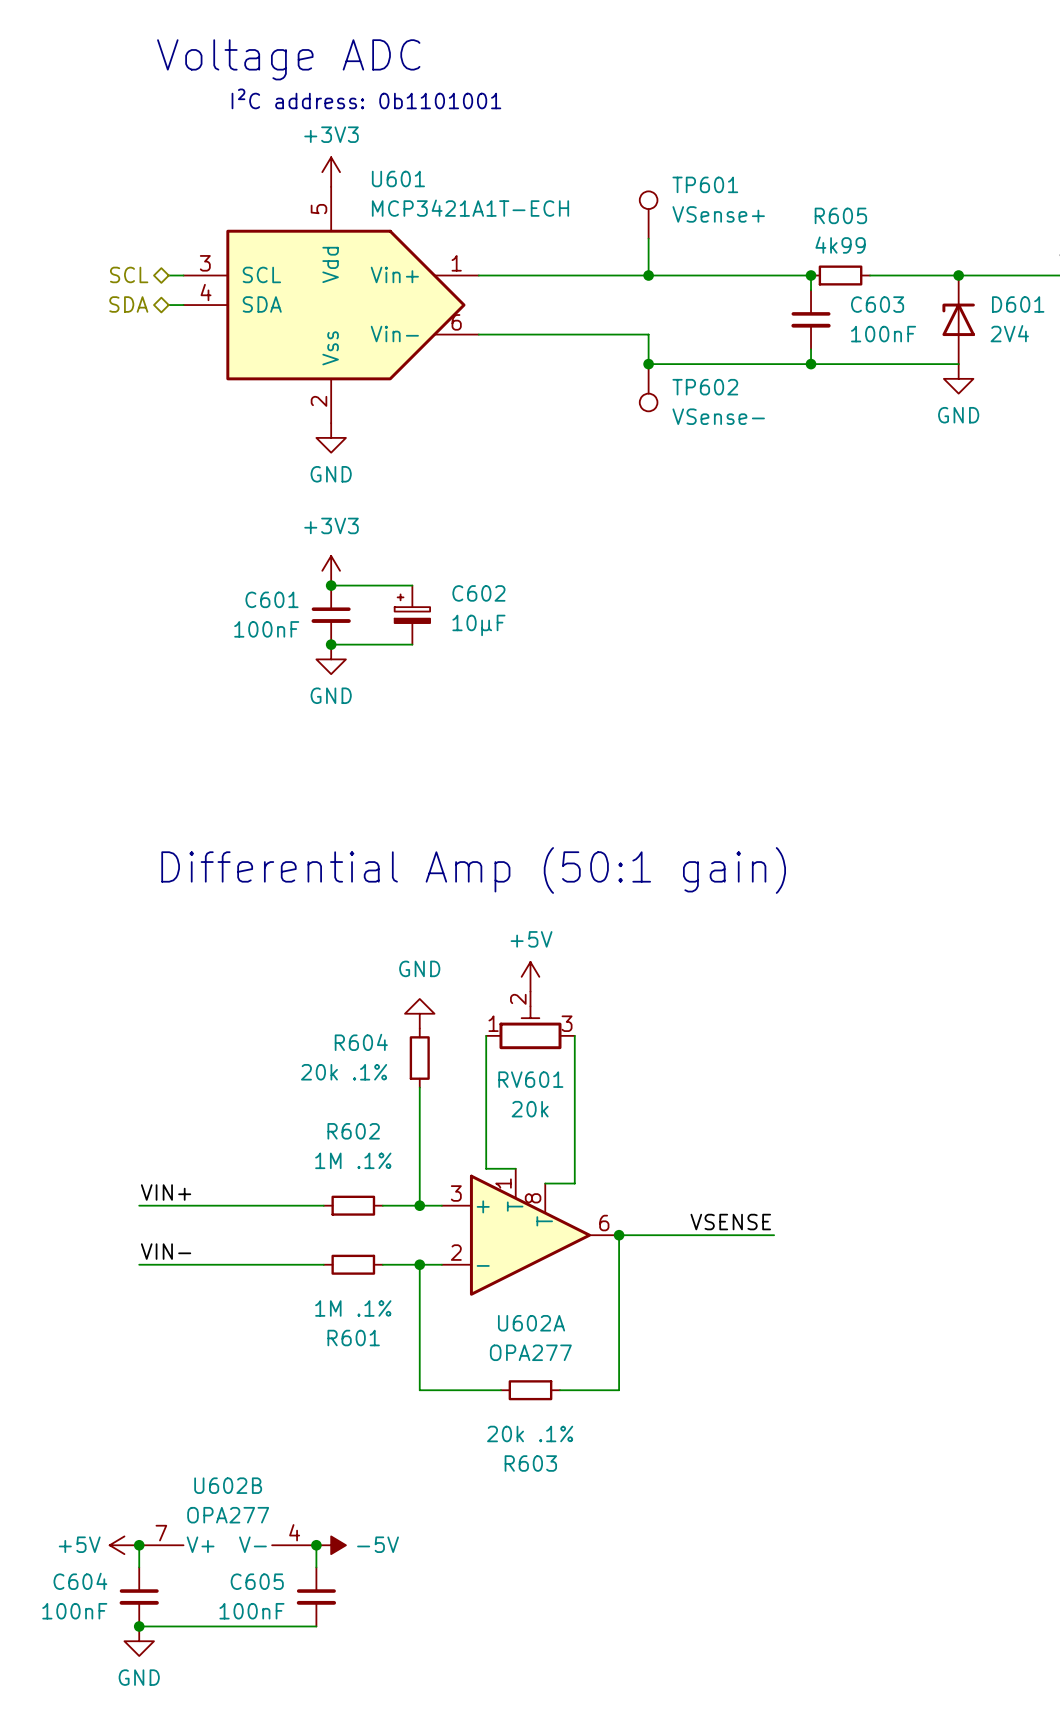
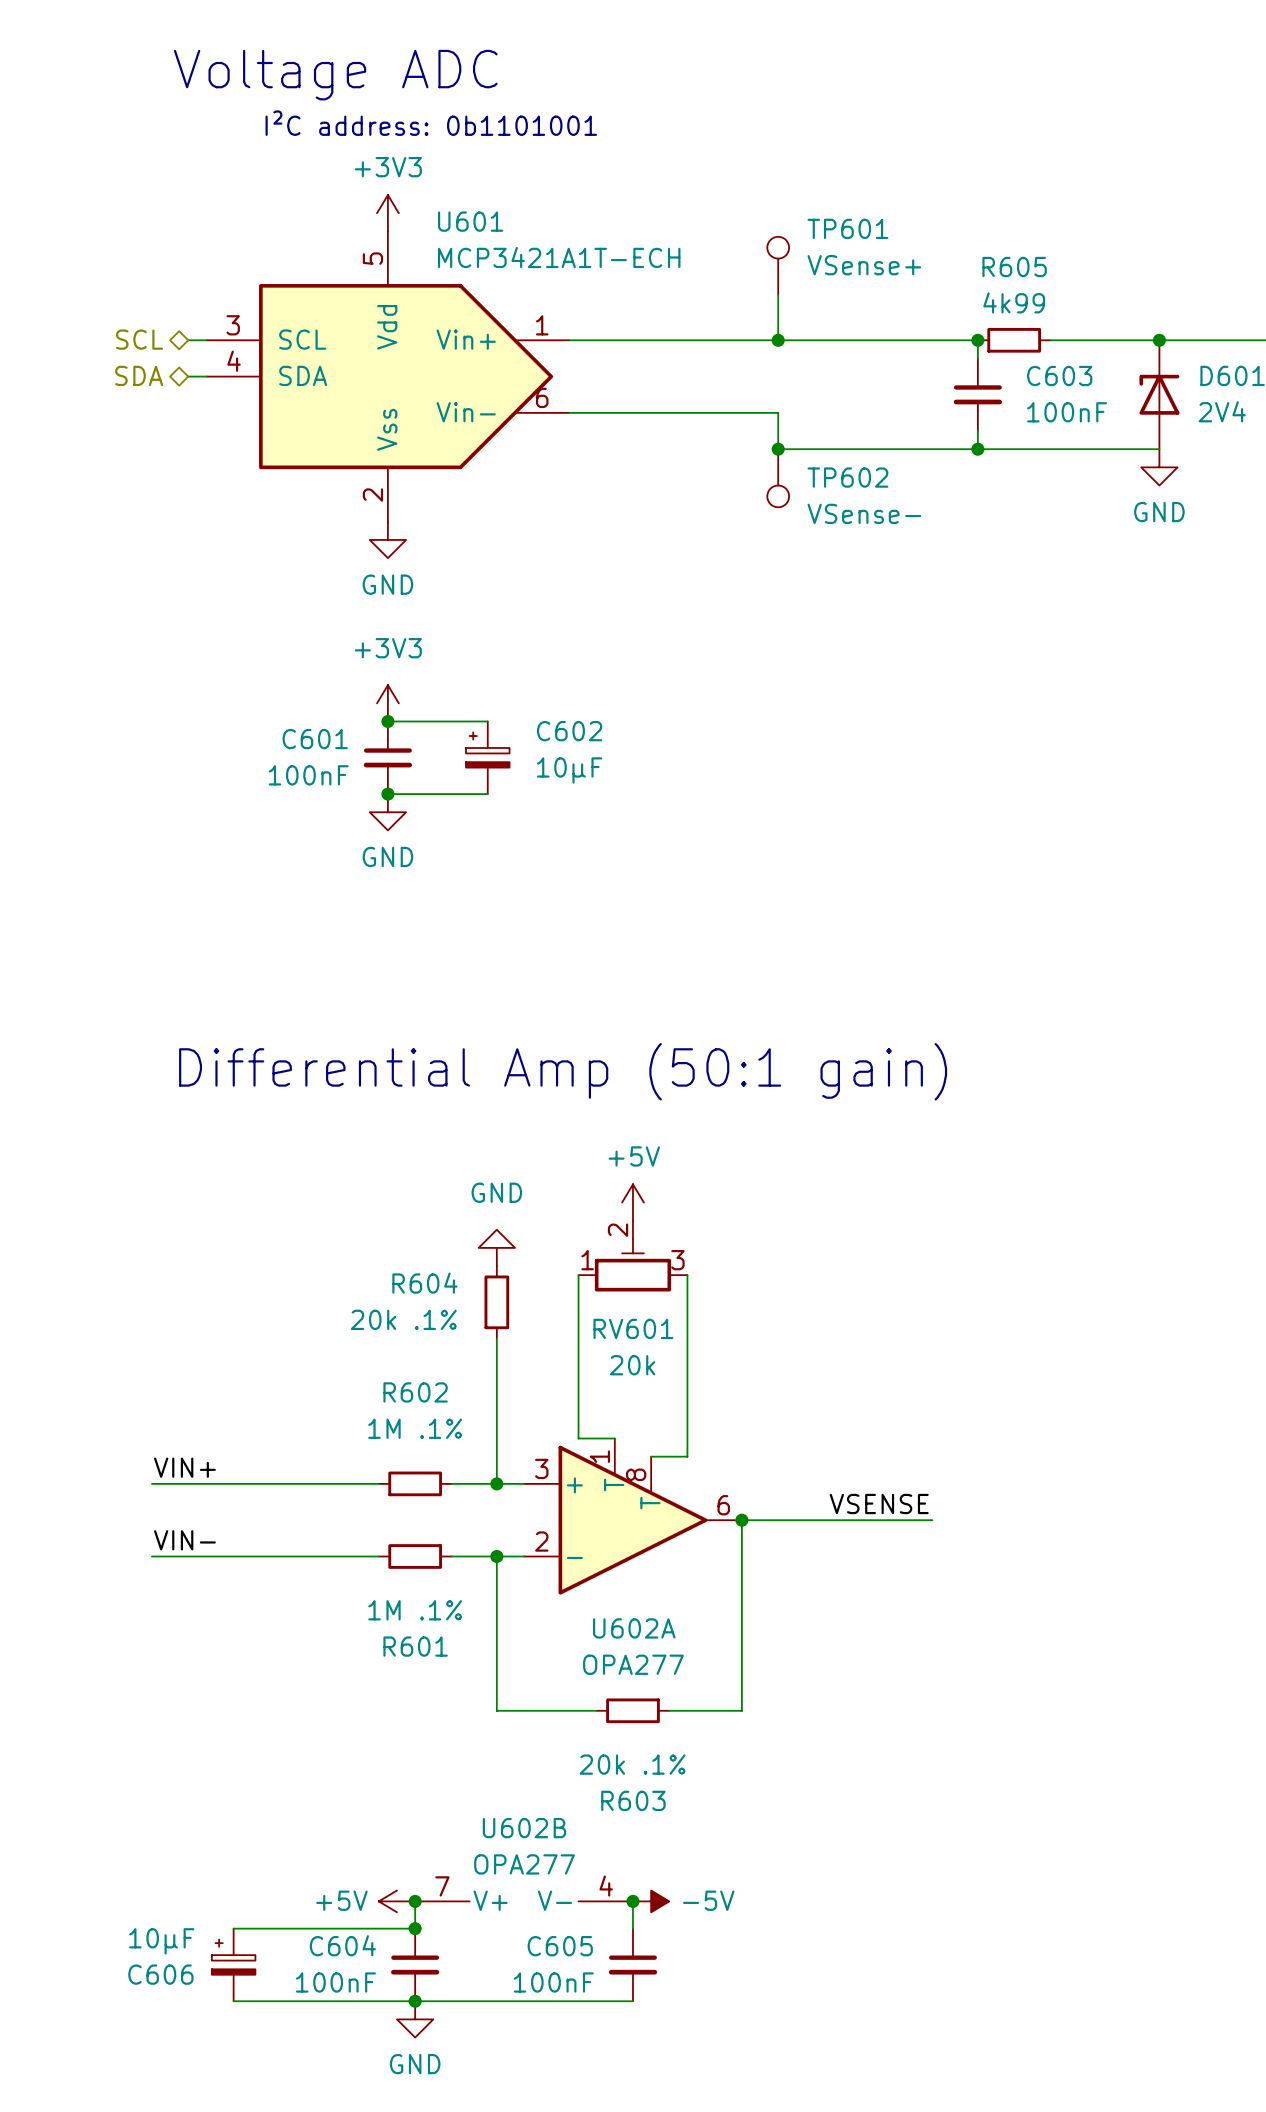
power symbol: +5V (124, 1545) -> none
wire: (139, 1545) (139, 1567) -> none
junction: (139, 1545) -> none
U602B position: (227, 1545) -> (524, 1901)
wire: (316, 1545) (316, 1567) -> (632, 1901) (632, 1928)
junction: (316, 1545) -> none
power symbol: -5V (331, 1545) -> +5V (397, 1901)
wire: none -> (415, 1901) (415, 1928) (233, 1928)
junction: none -> (415, 1901)
junction: none -> (632, 1901)
power symbol: none -> -5V (651, 1901)
junction: none -> (415, 1928)
C604 position: (139, 1596) -> (415, 1964)
C606: none -> 10µF (233, 1964)
C605 position: (316, 1596) -> (632, 1964)
wire: (139, 1626) (205, 1626) -> none
junction: (139, 1626) -> none
wire: none -> (369, 2001) (632, 2001)
junction: none -> (415, 2001)
power symbol position: GND (139, 1641) -> GND (415, 2019)

